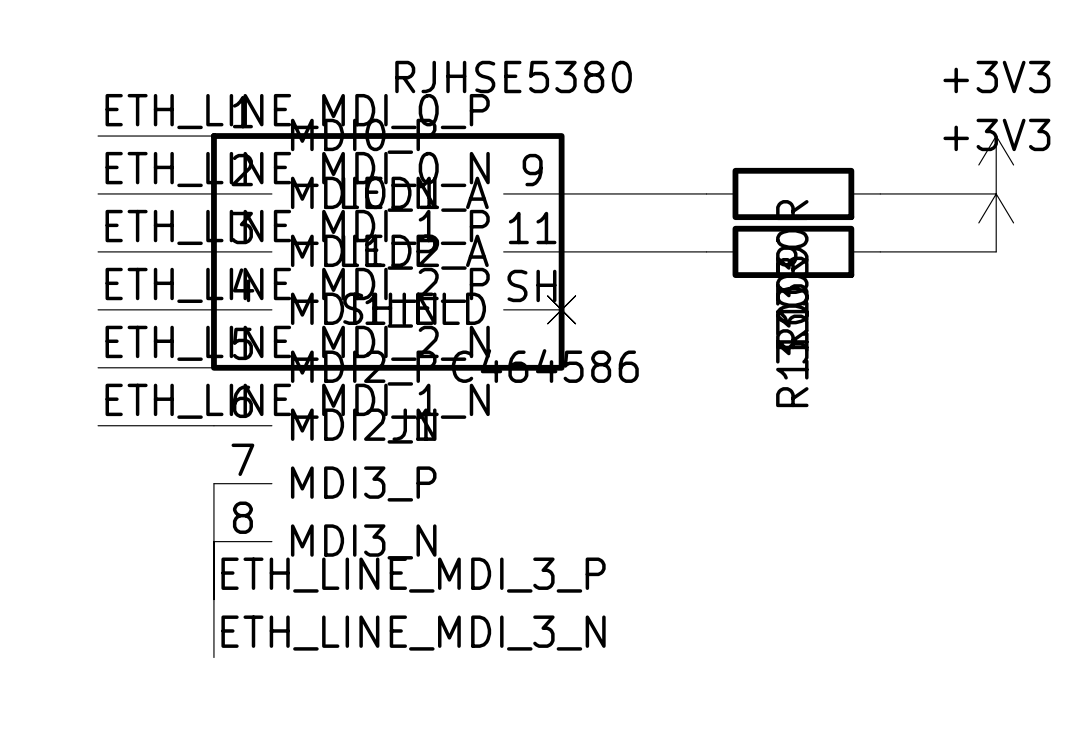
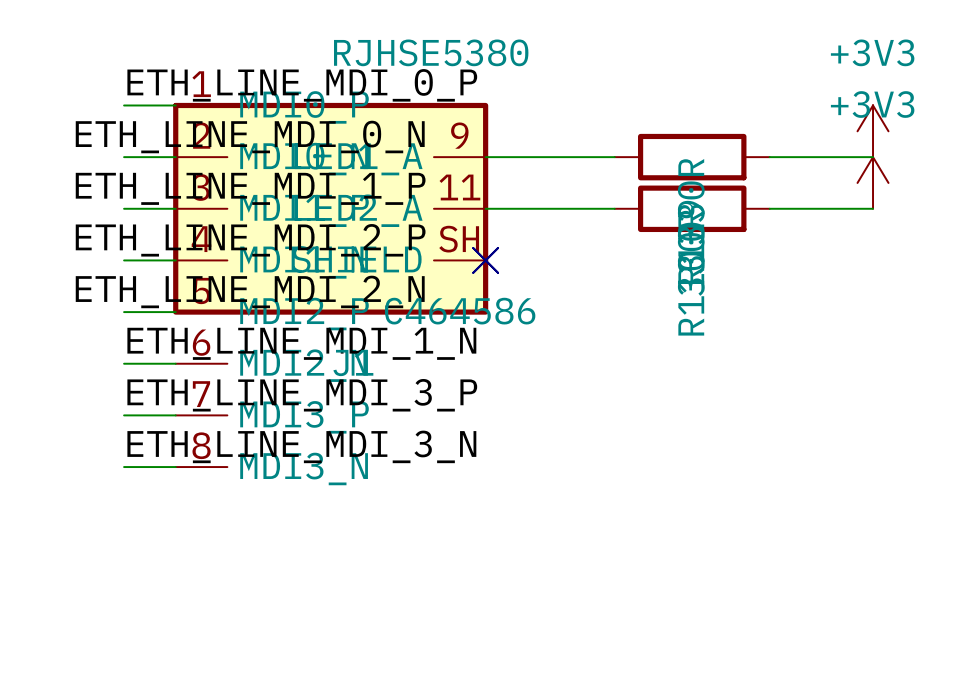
label position: ETH_LINE_MDI_0_P (297, 111) -> ETH_LINE_MDI_0_P (302, 85)
wire: (98, 136) (156, 136) -> none
wire: (98, 193) (156, 193) -> none
wire: (98, 251) (156, 251) -> none
wire: (98, 309) (156, 309) -> none
wire: (98, 367) (156, 367) -> none
label position: ETH_LINE_MDI_1_N (297, 401) -> ETH_LINE_MDI_1_N (301, 343)
wire: (98, 425) (156, 425) -> (124, 467) (175, 467)
wire: (213, 483) (213, 657) -> (175, 415) (124, 415)
label position: ETH_LINE_MDI_3_P (413, 575) -> ETH_LINE_MDI_3_P (302, 395)
label position: ETH_LINE_MDI_3_N (413, 633) -> ETH_LINE_MDI_3_N (301, 446)

